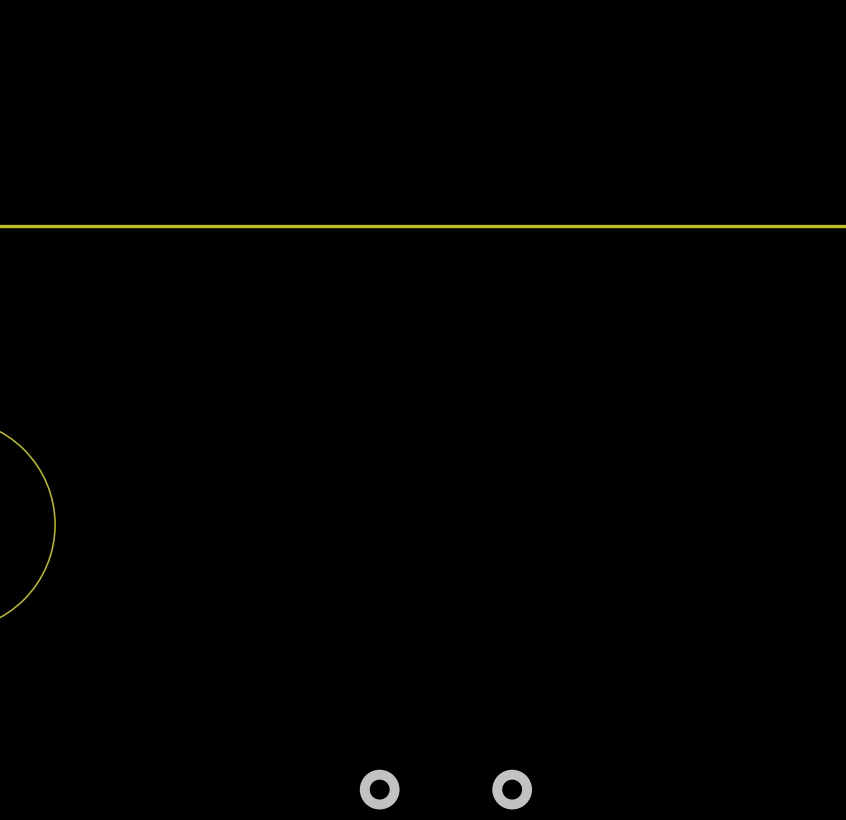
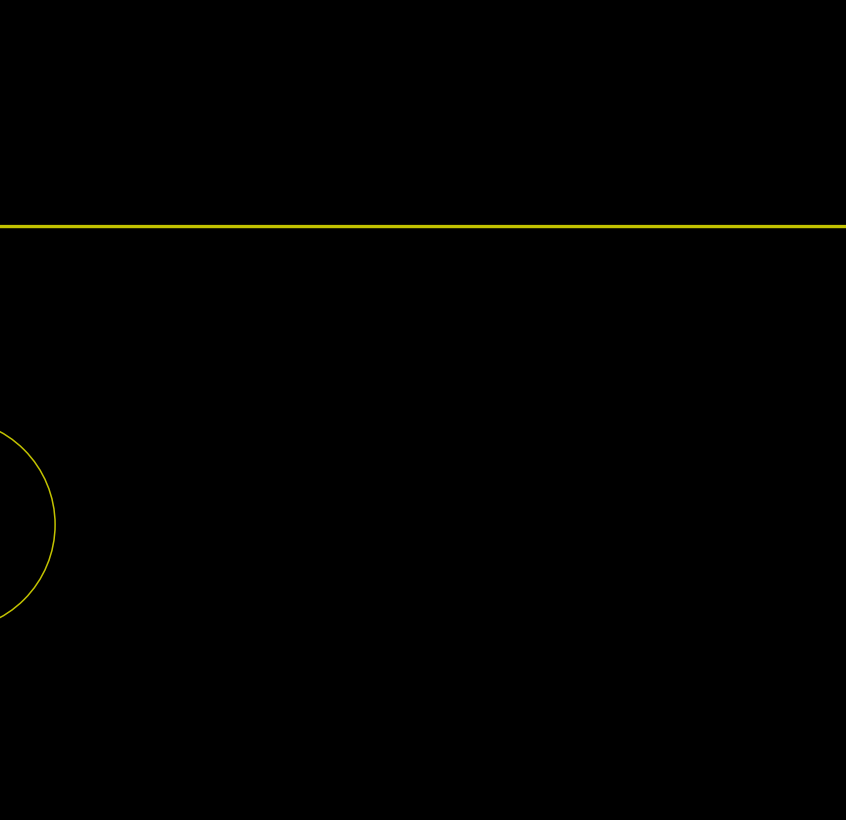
via: (379, 789) -> none
via: (512, 789) -> none

